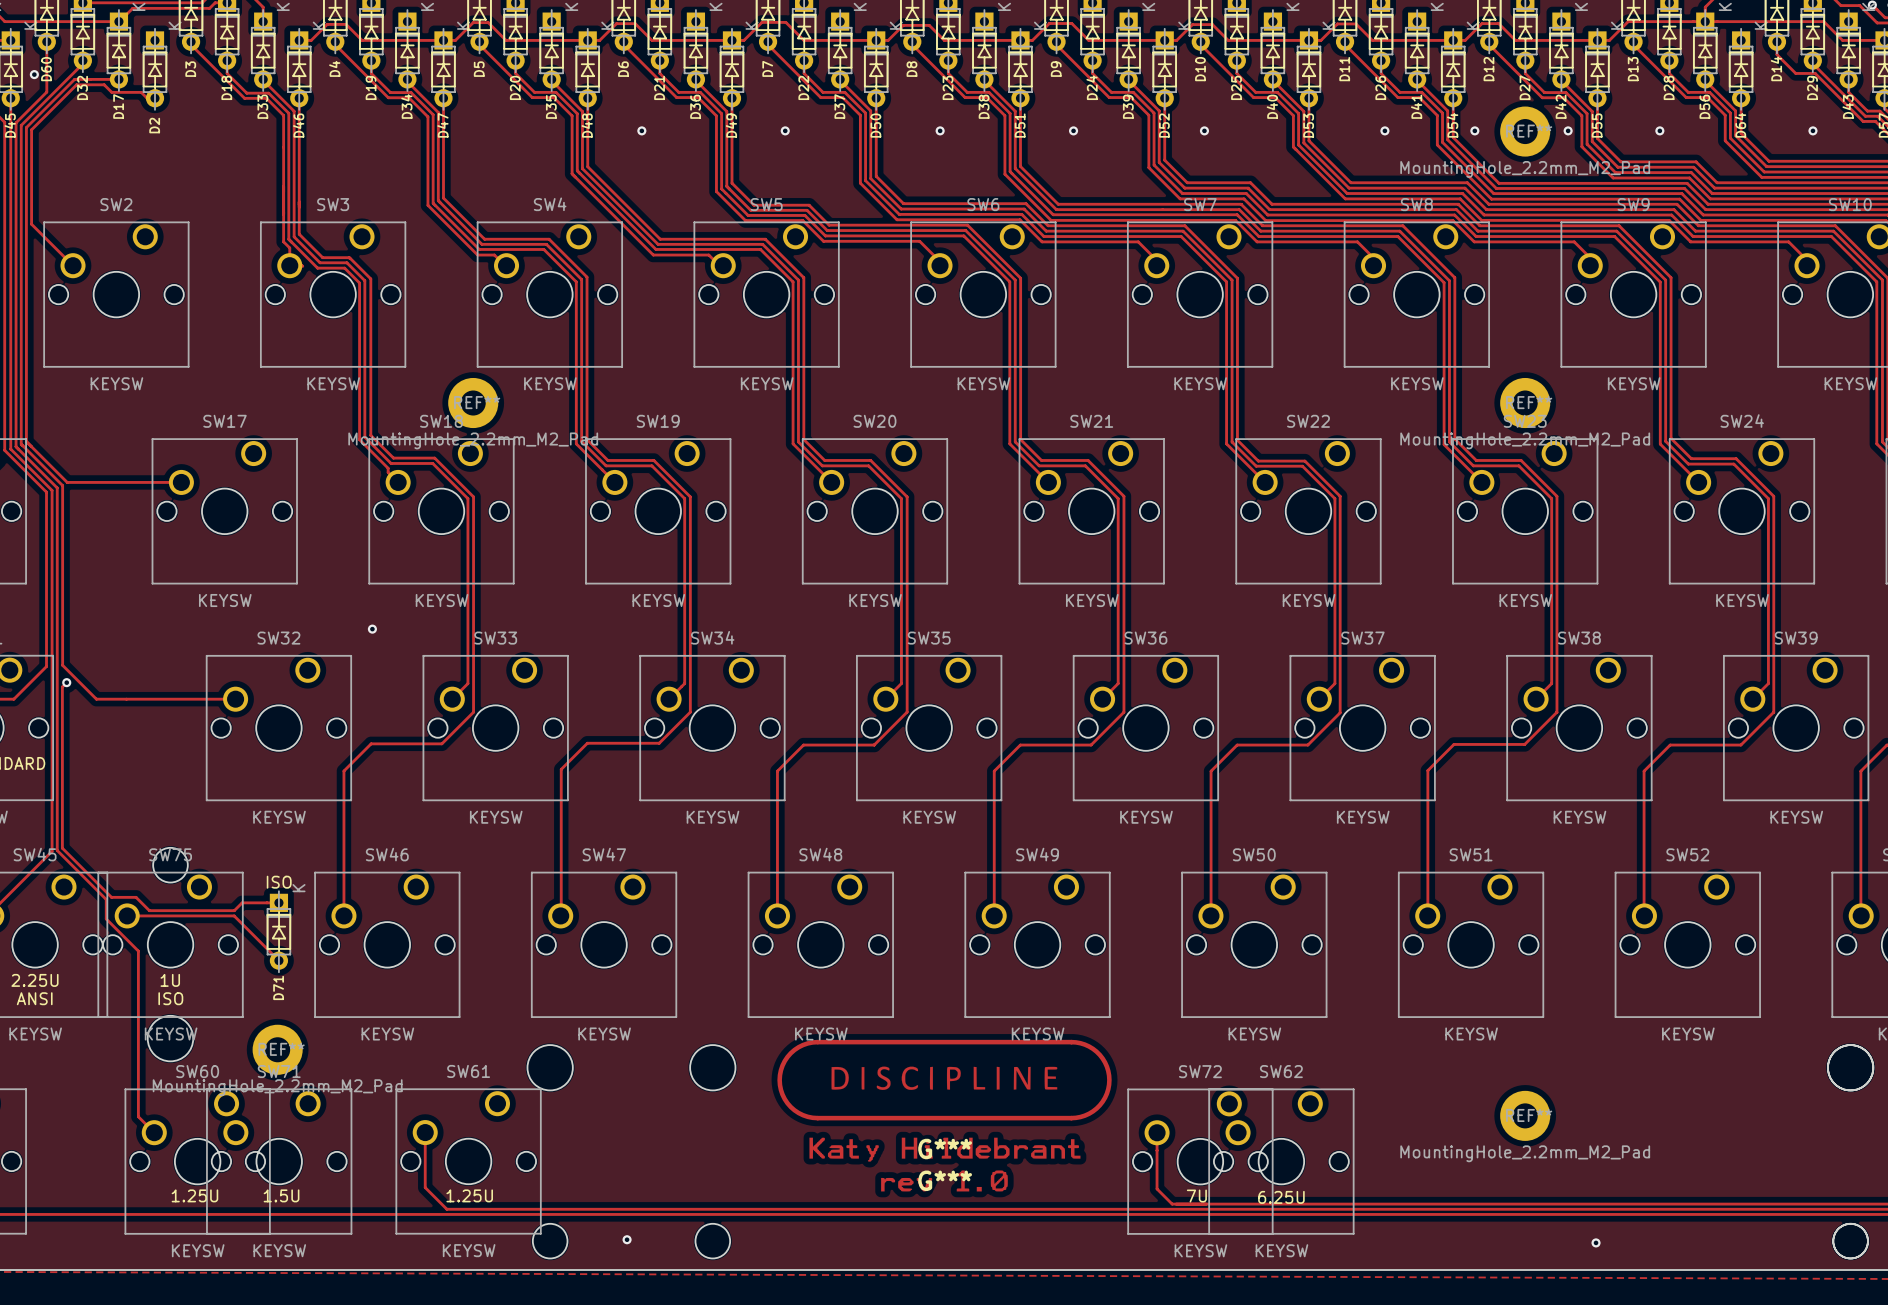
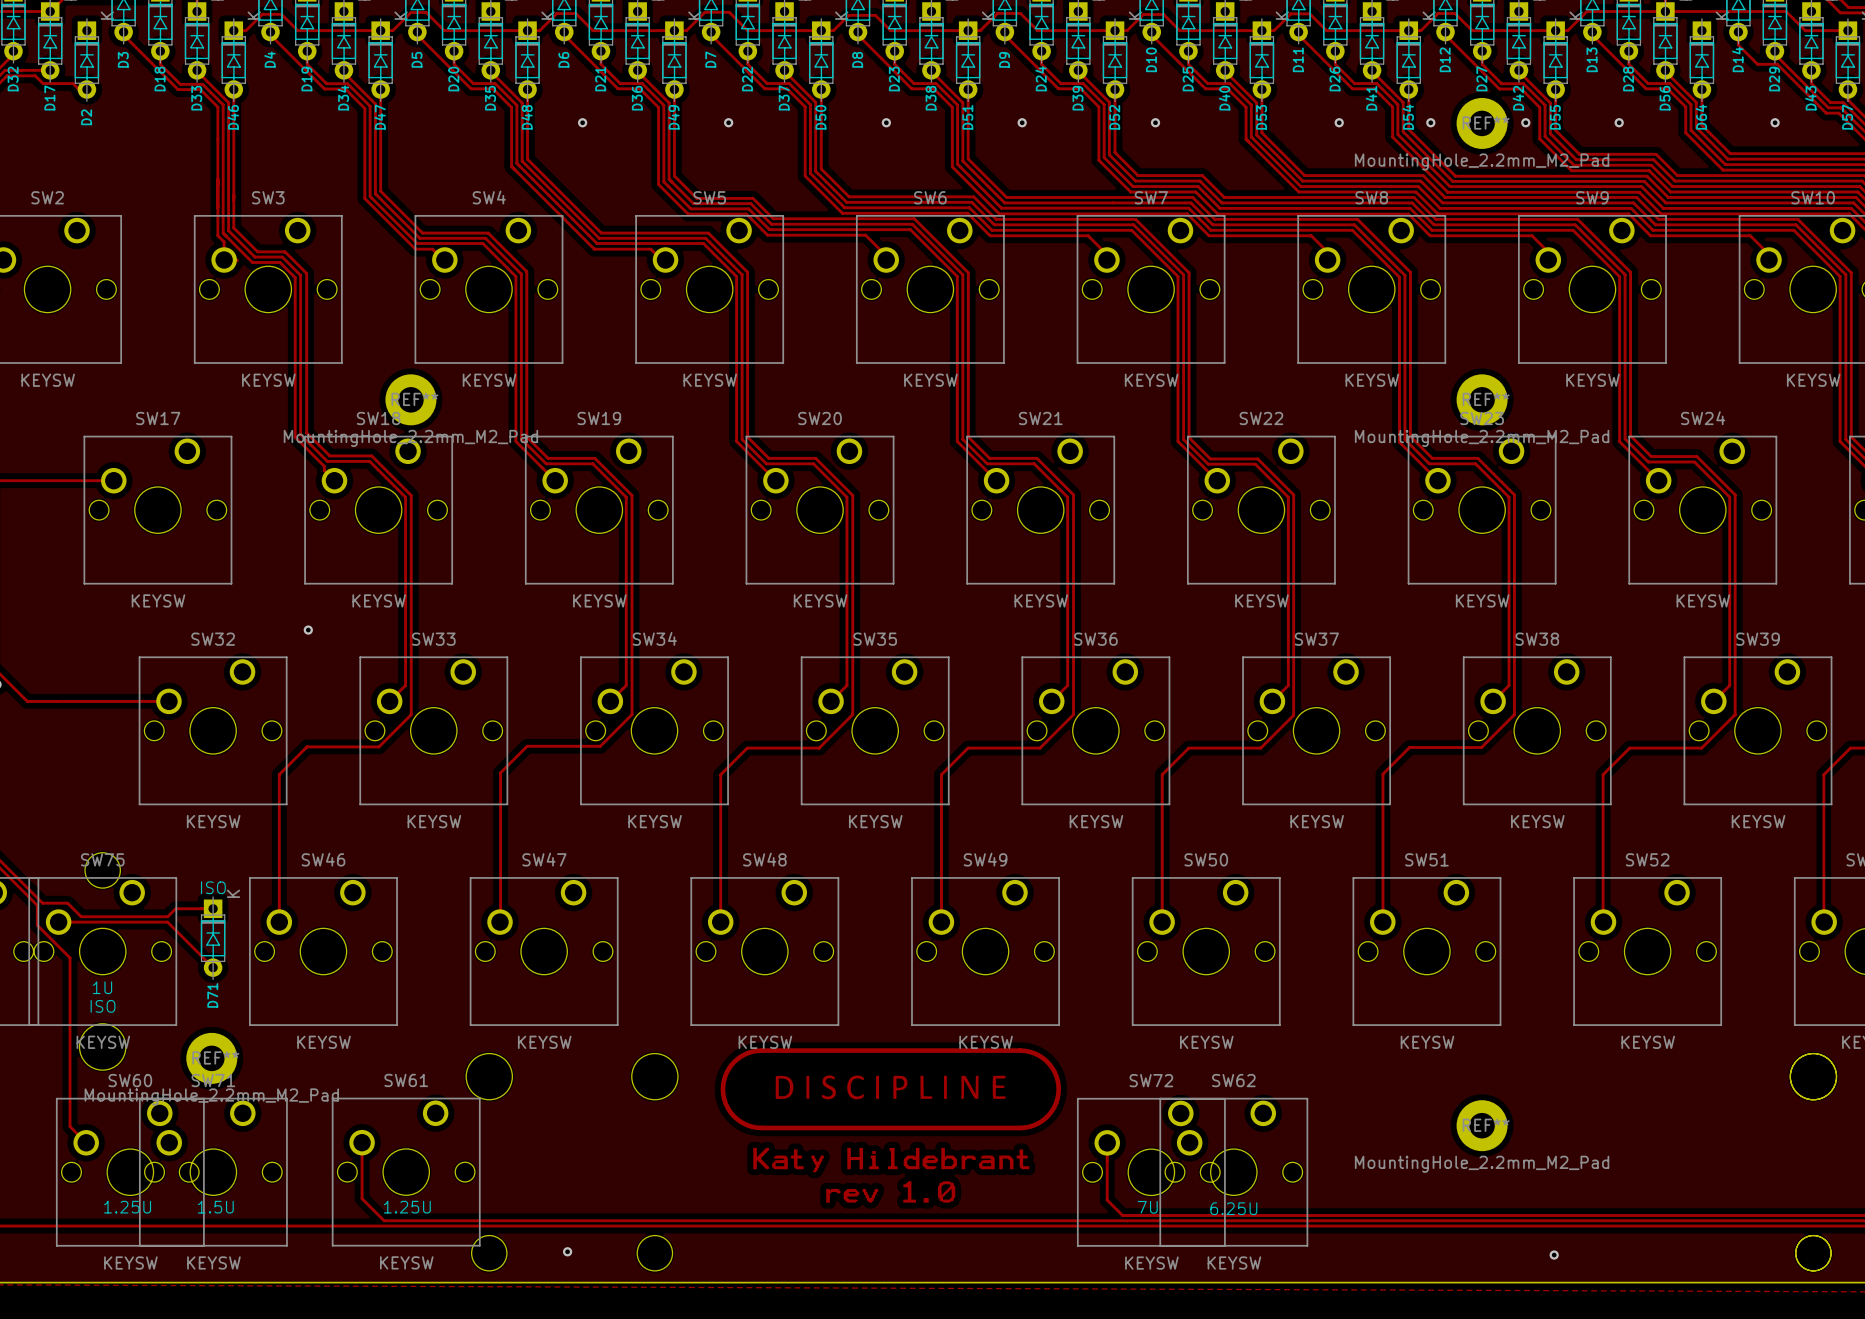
drawing: none -> [753, 1147, 1030, 1203]
G***: (944, 1149) -> none
G***: (944, 1180) -> none

